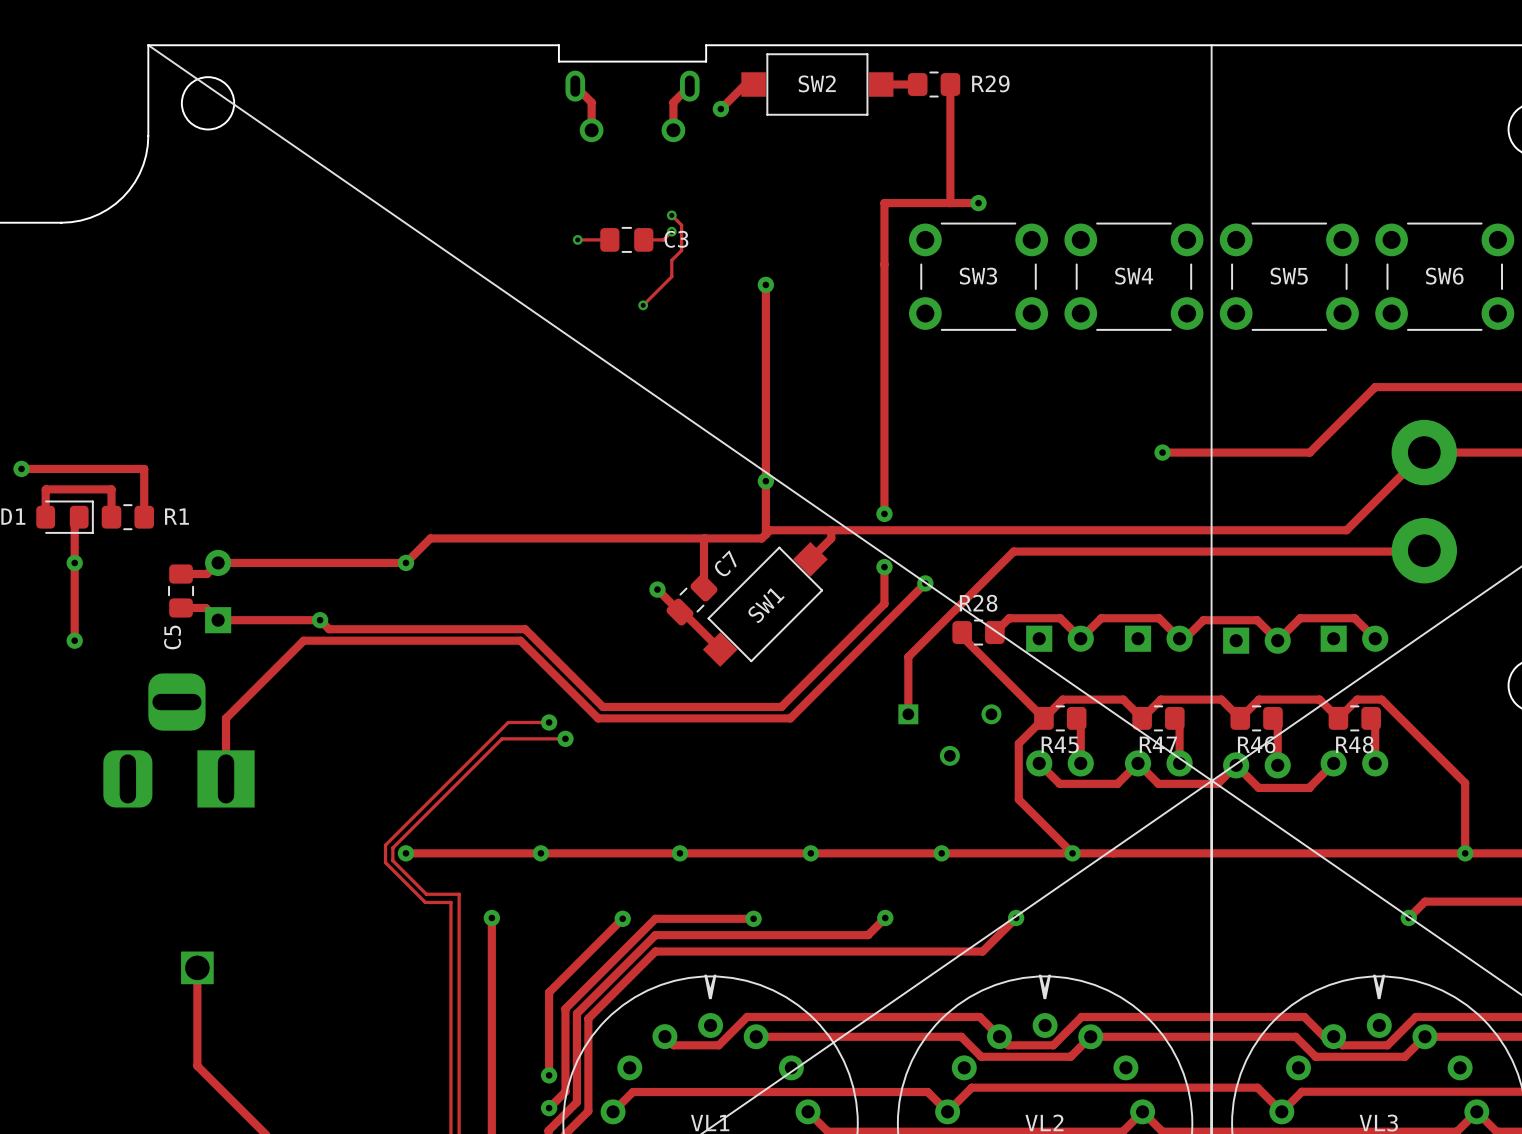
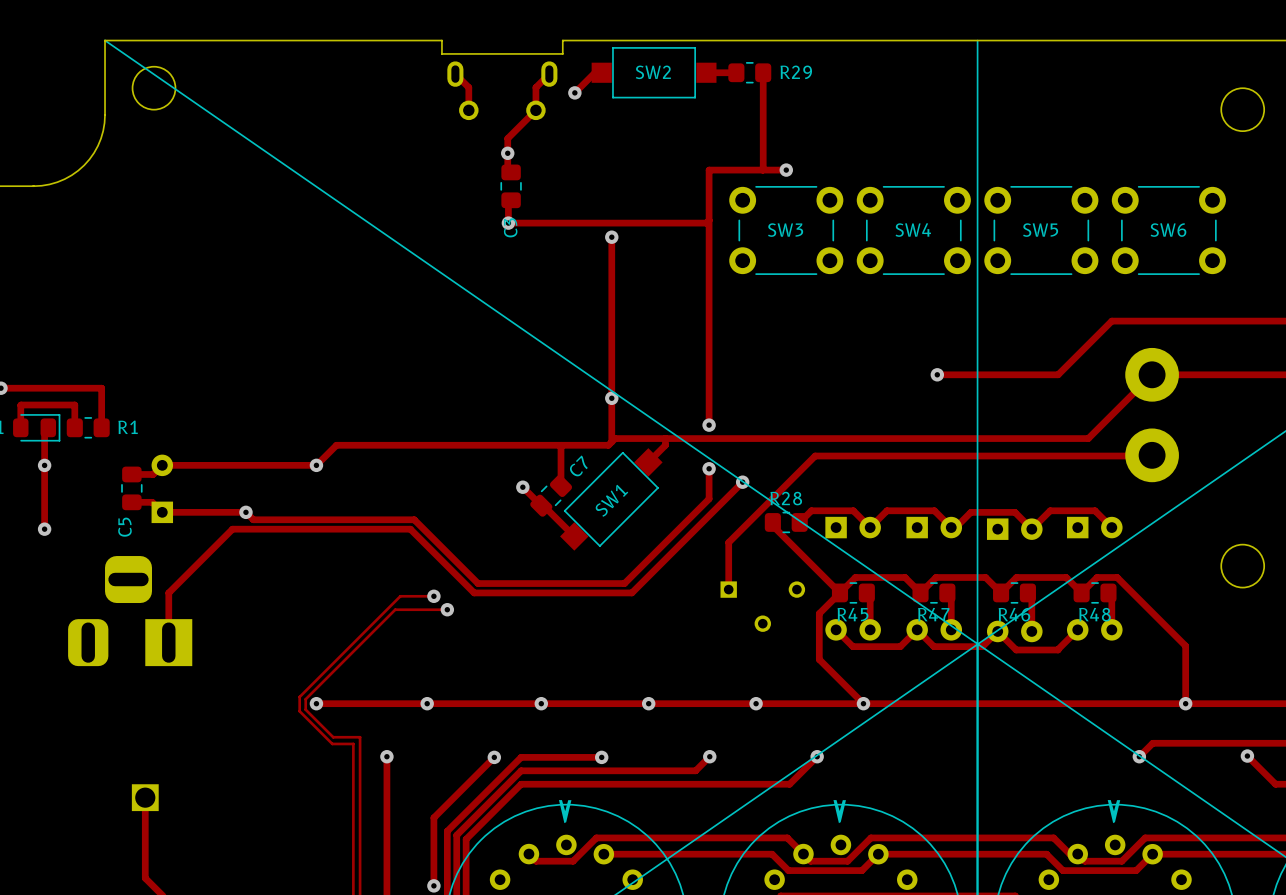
track: none -> (535, 110) (507, 138) (507, 169) (511, 172)
via: none -> (507, 153)
track: (671, 215) (681, 225) (681, 250) (671, 260) (671, 276) (643, 305) -> none
via: (671, 215) -> none
track: (671, 231) (663, 239) (643, 239) -> (709, 220) (706, 223) (508, 223) (508, 202) (511, 200)
via: (671, 231) -> none
track: (577, 239) (609, 239) -> none
via: (577, 239) -> none
C3 rotation: 0° (626, 239) -> 90° clockwise (511, 186)
via: none -> (508, 223)
via: (643, 305) -> none

